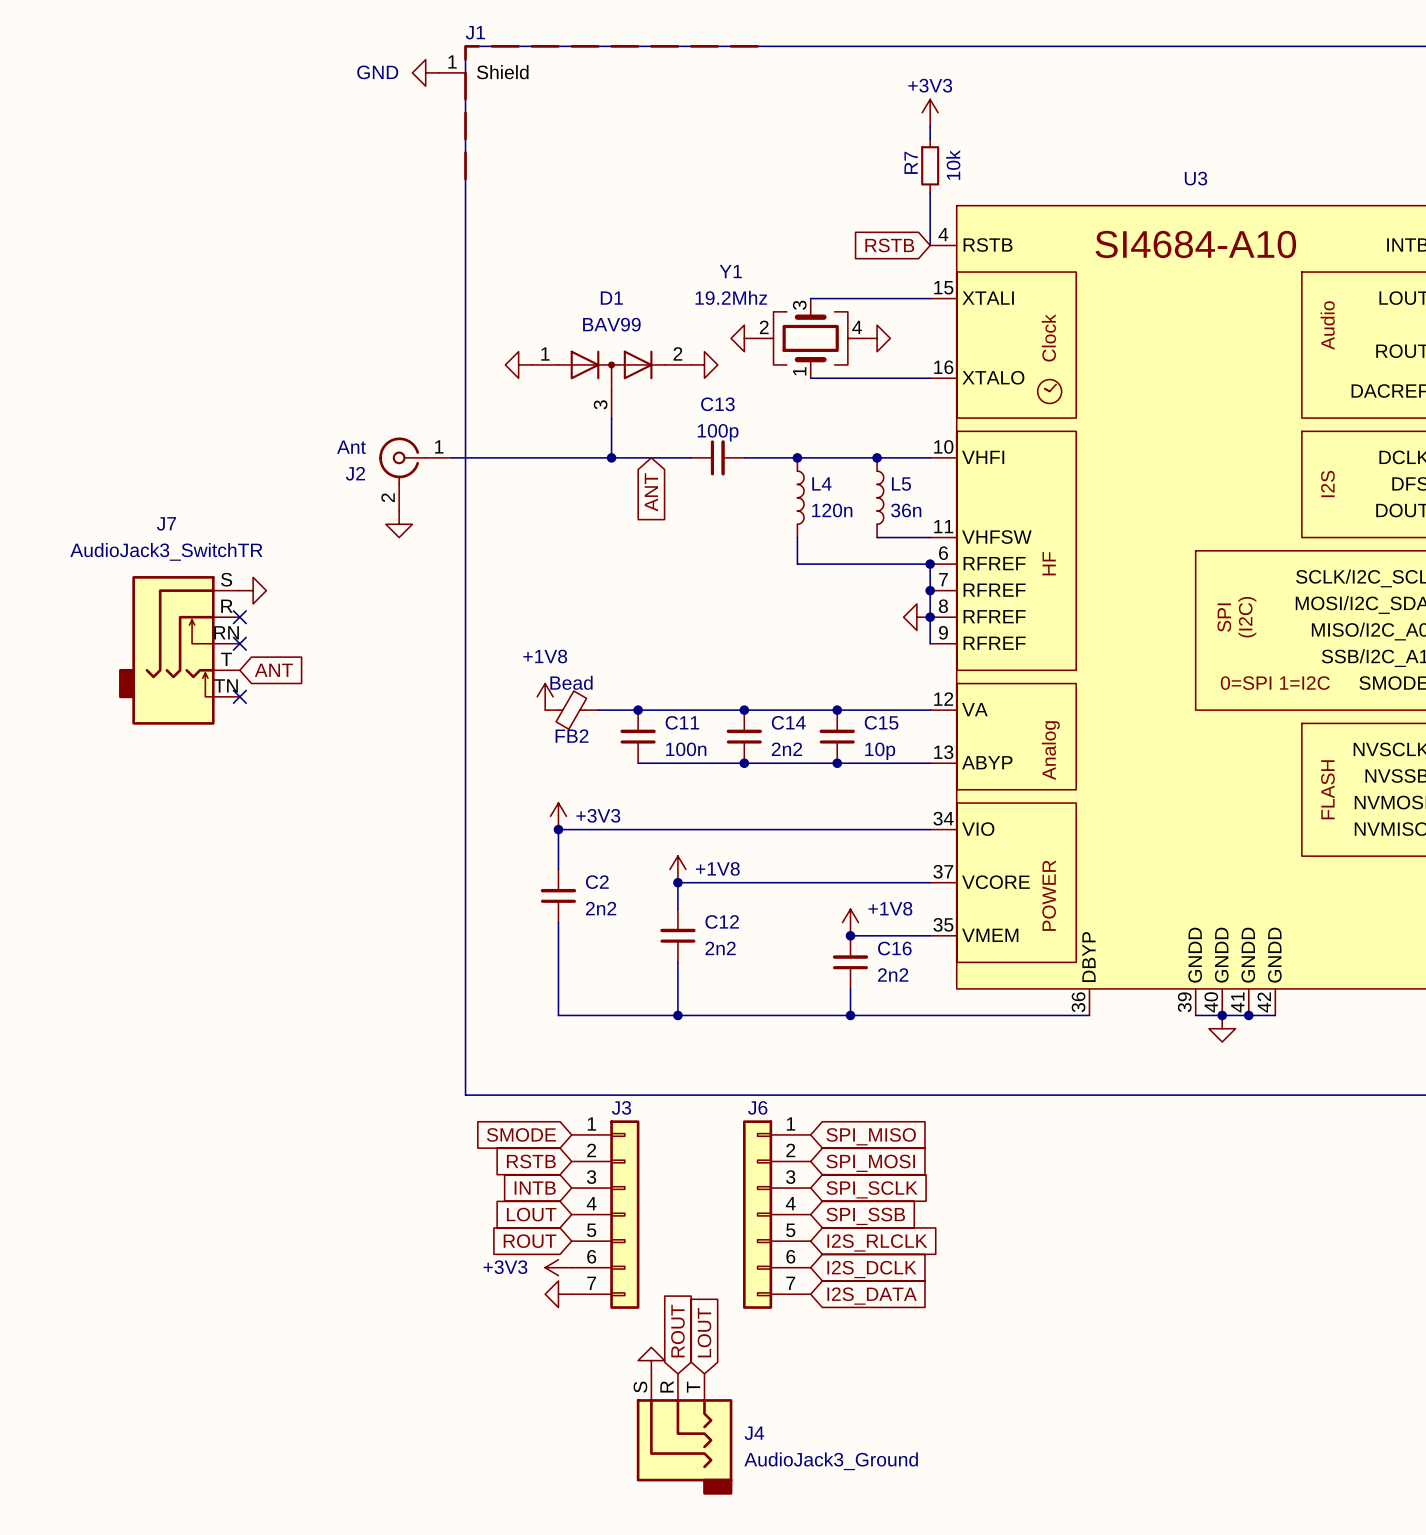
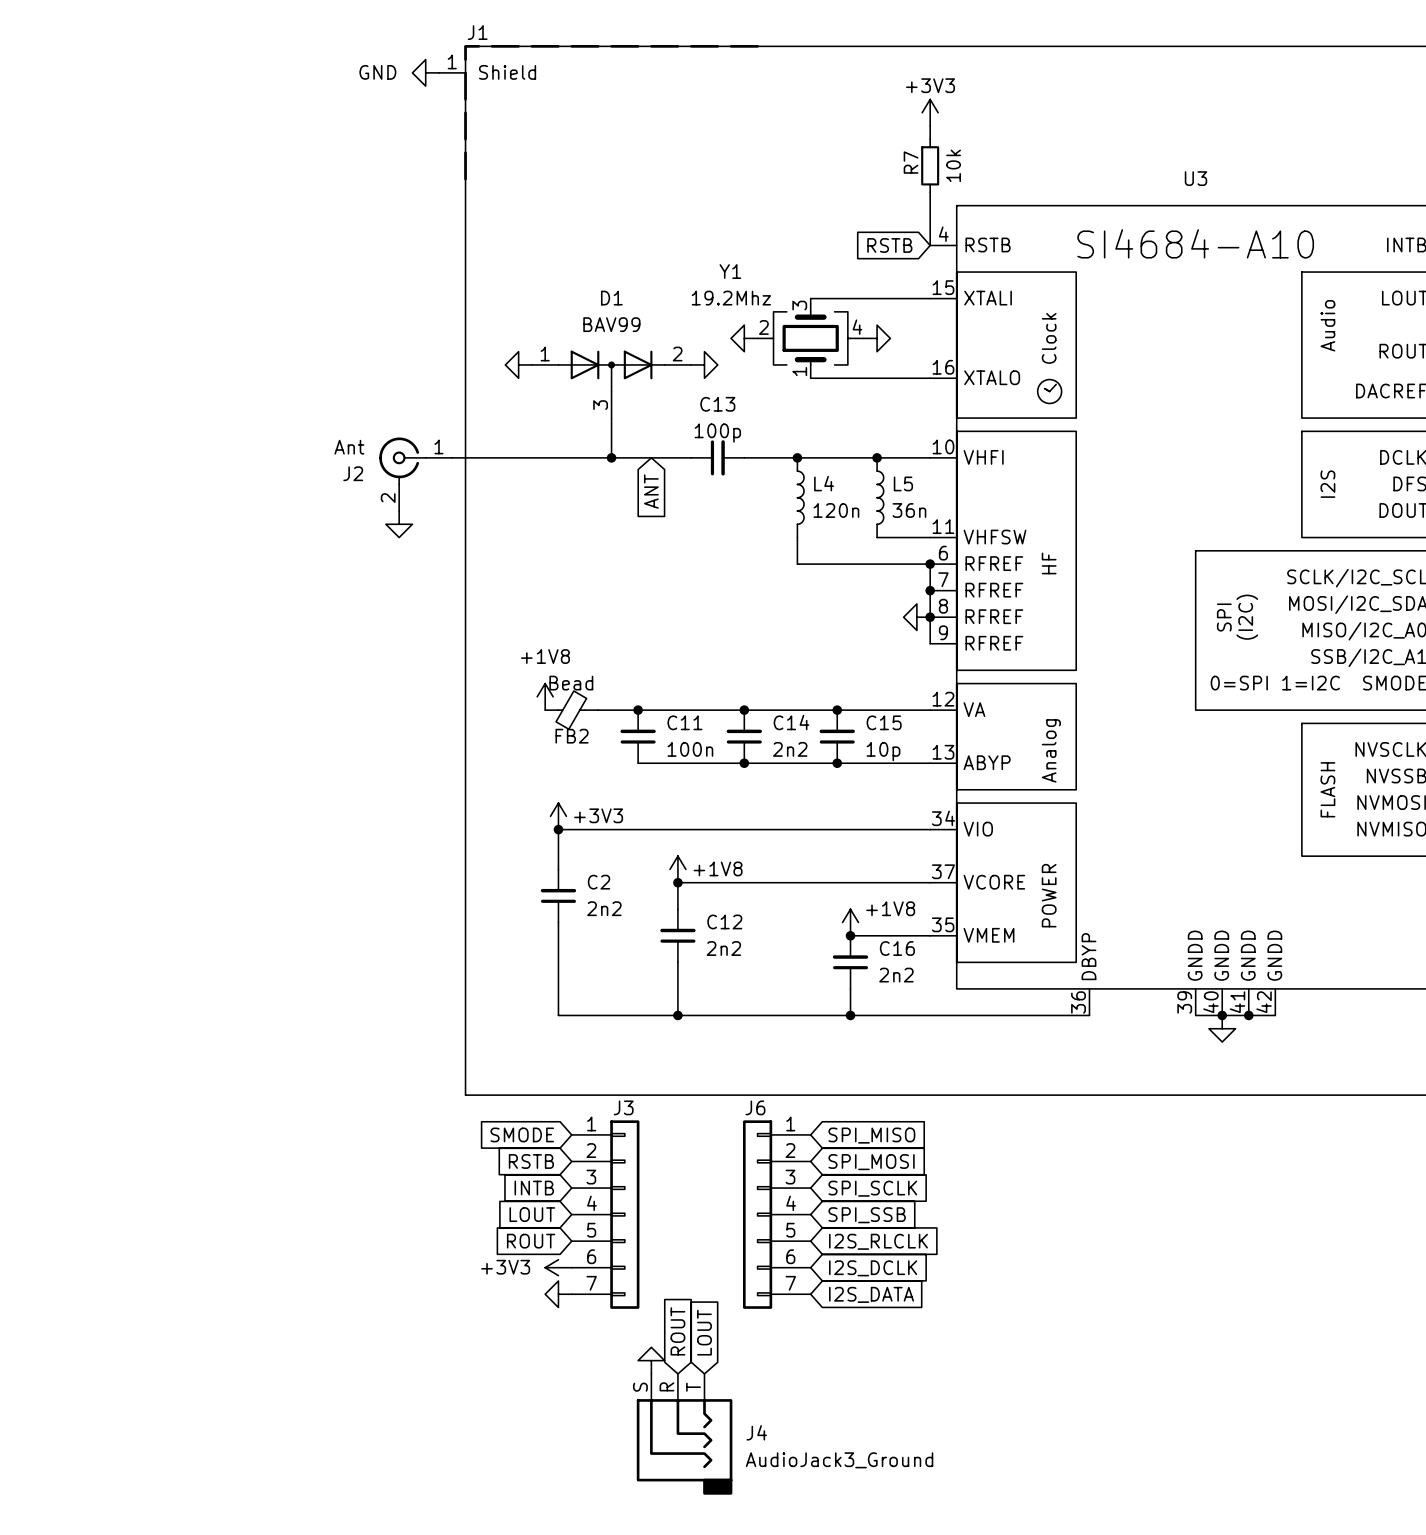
power symbol: (253, 590) -> none
no-connect mark: (239, 617) -> none
no-connect mark: (239, 643) -> none
J7: AudioJack3_SwitchTR (179, 650) -> none
global label: ANT (273, 670) -> none
no-connect mark: (239, 696) -> none

